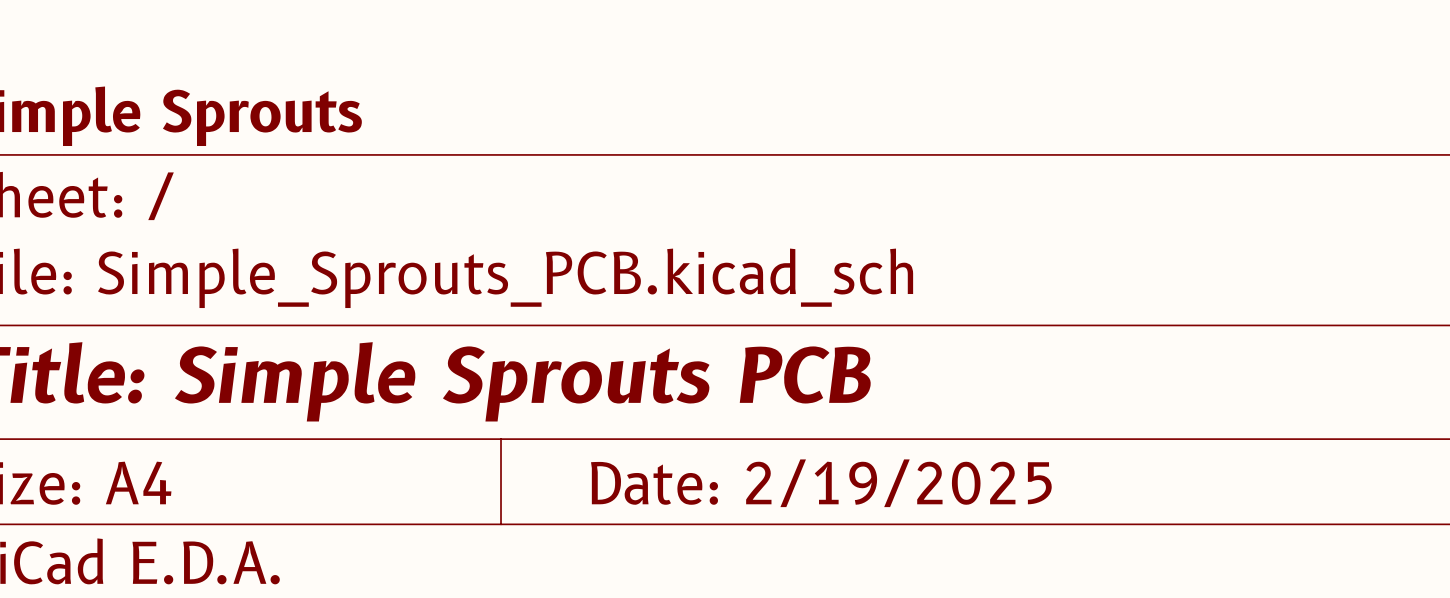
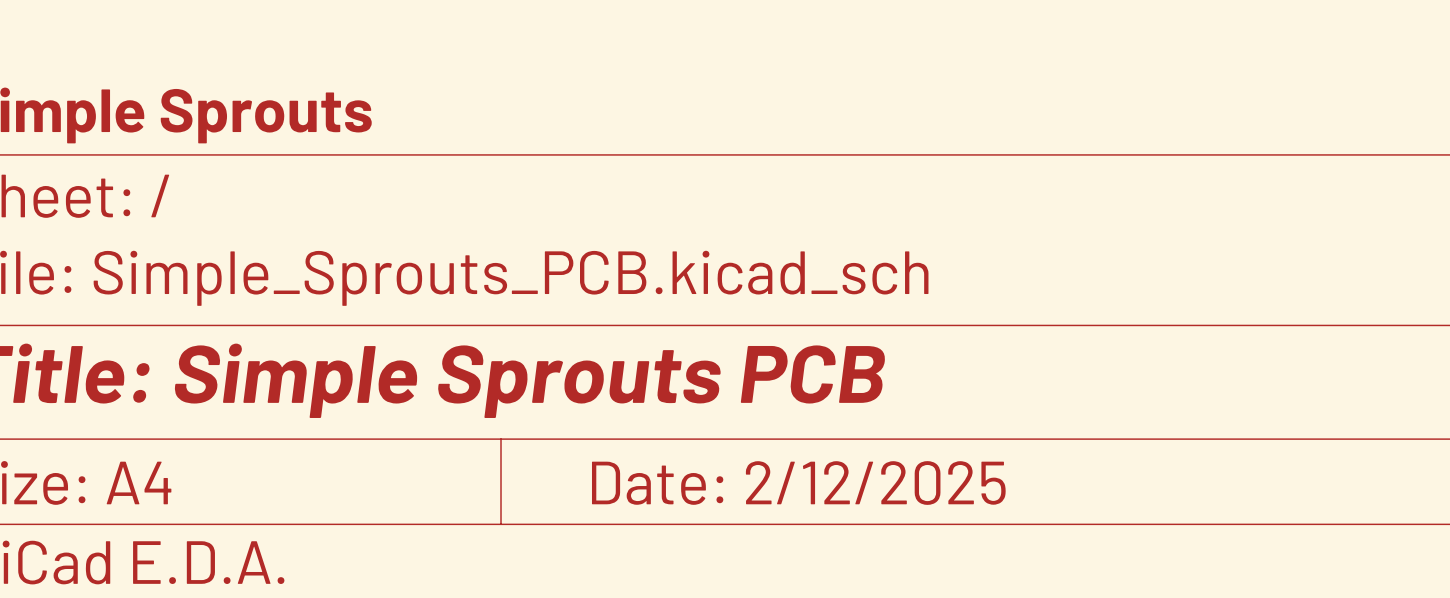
title block: Date: 2/19/2025 (821, 483) -> Date: 2/12/2025 (798, 483)

